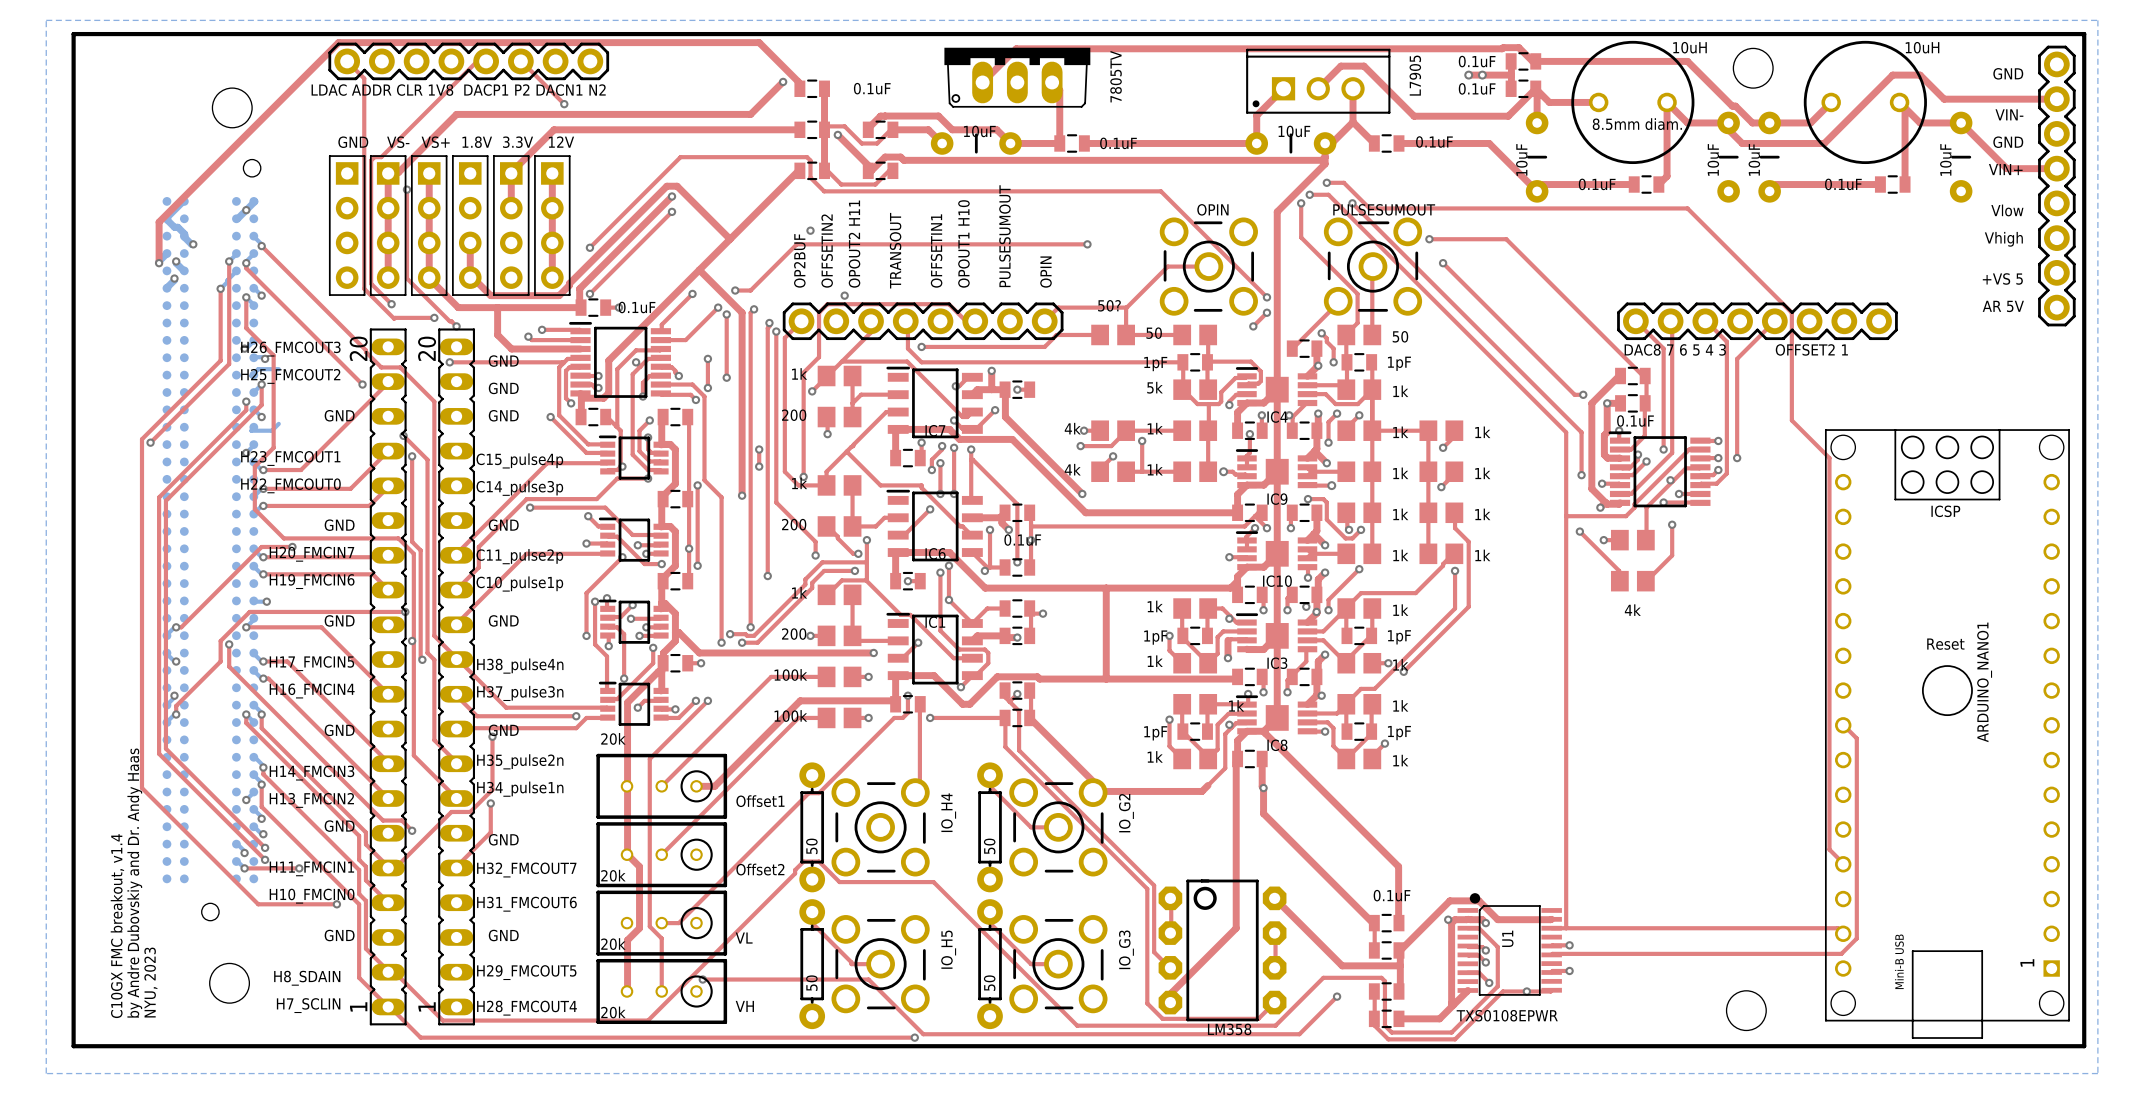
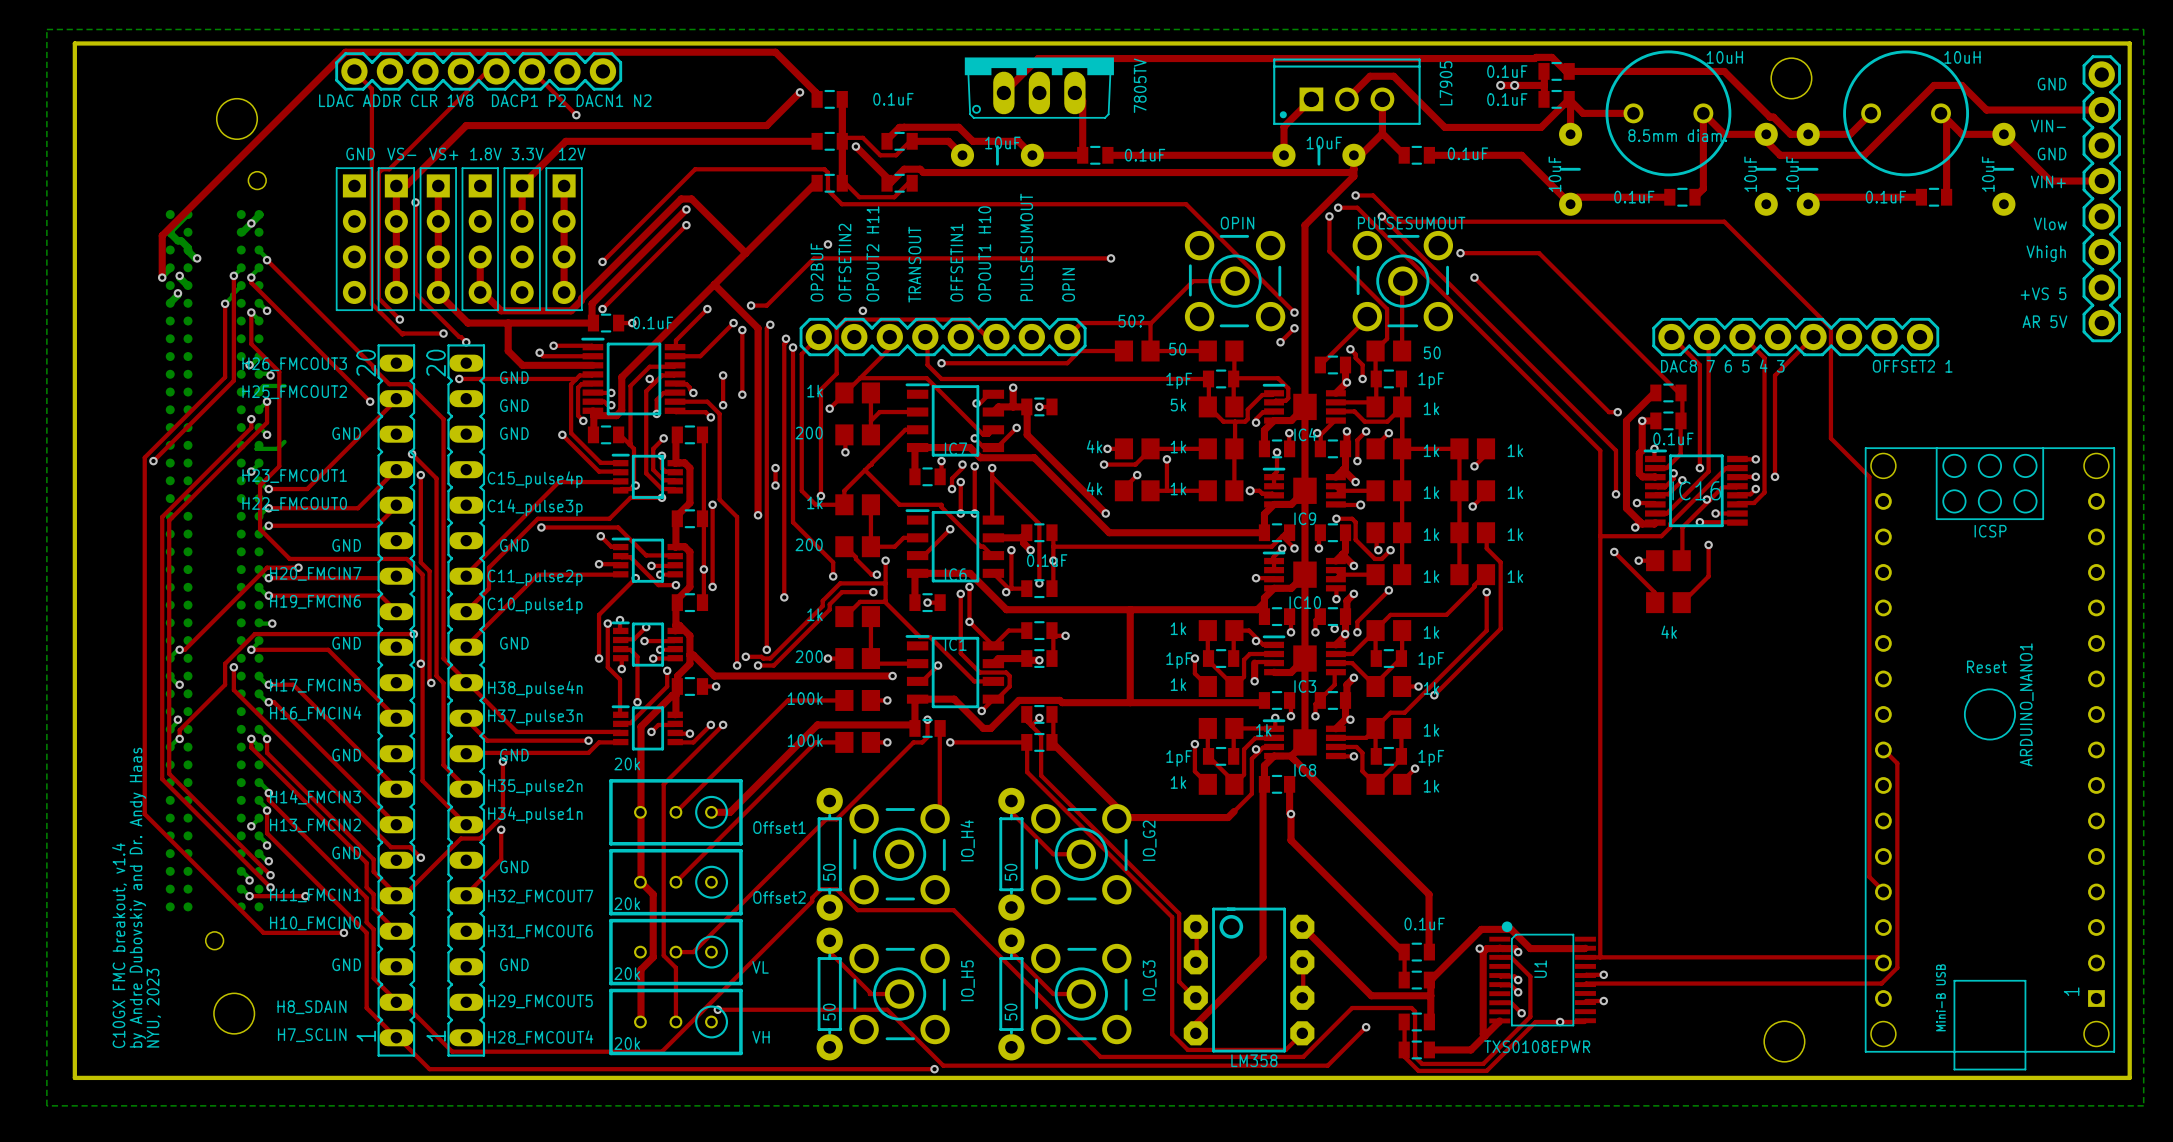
IC16 name: none -> IC16 (1696, 490)

